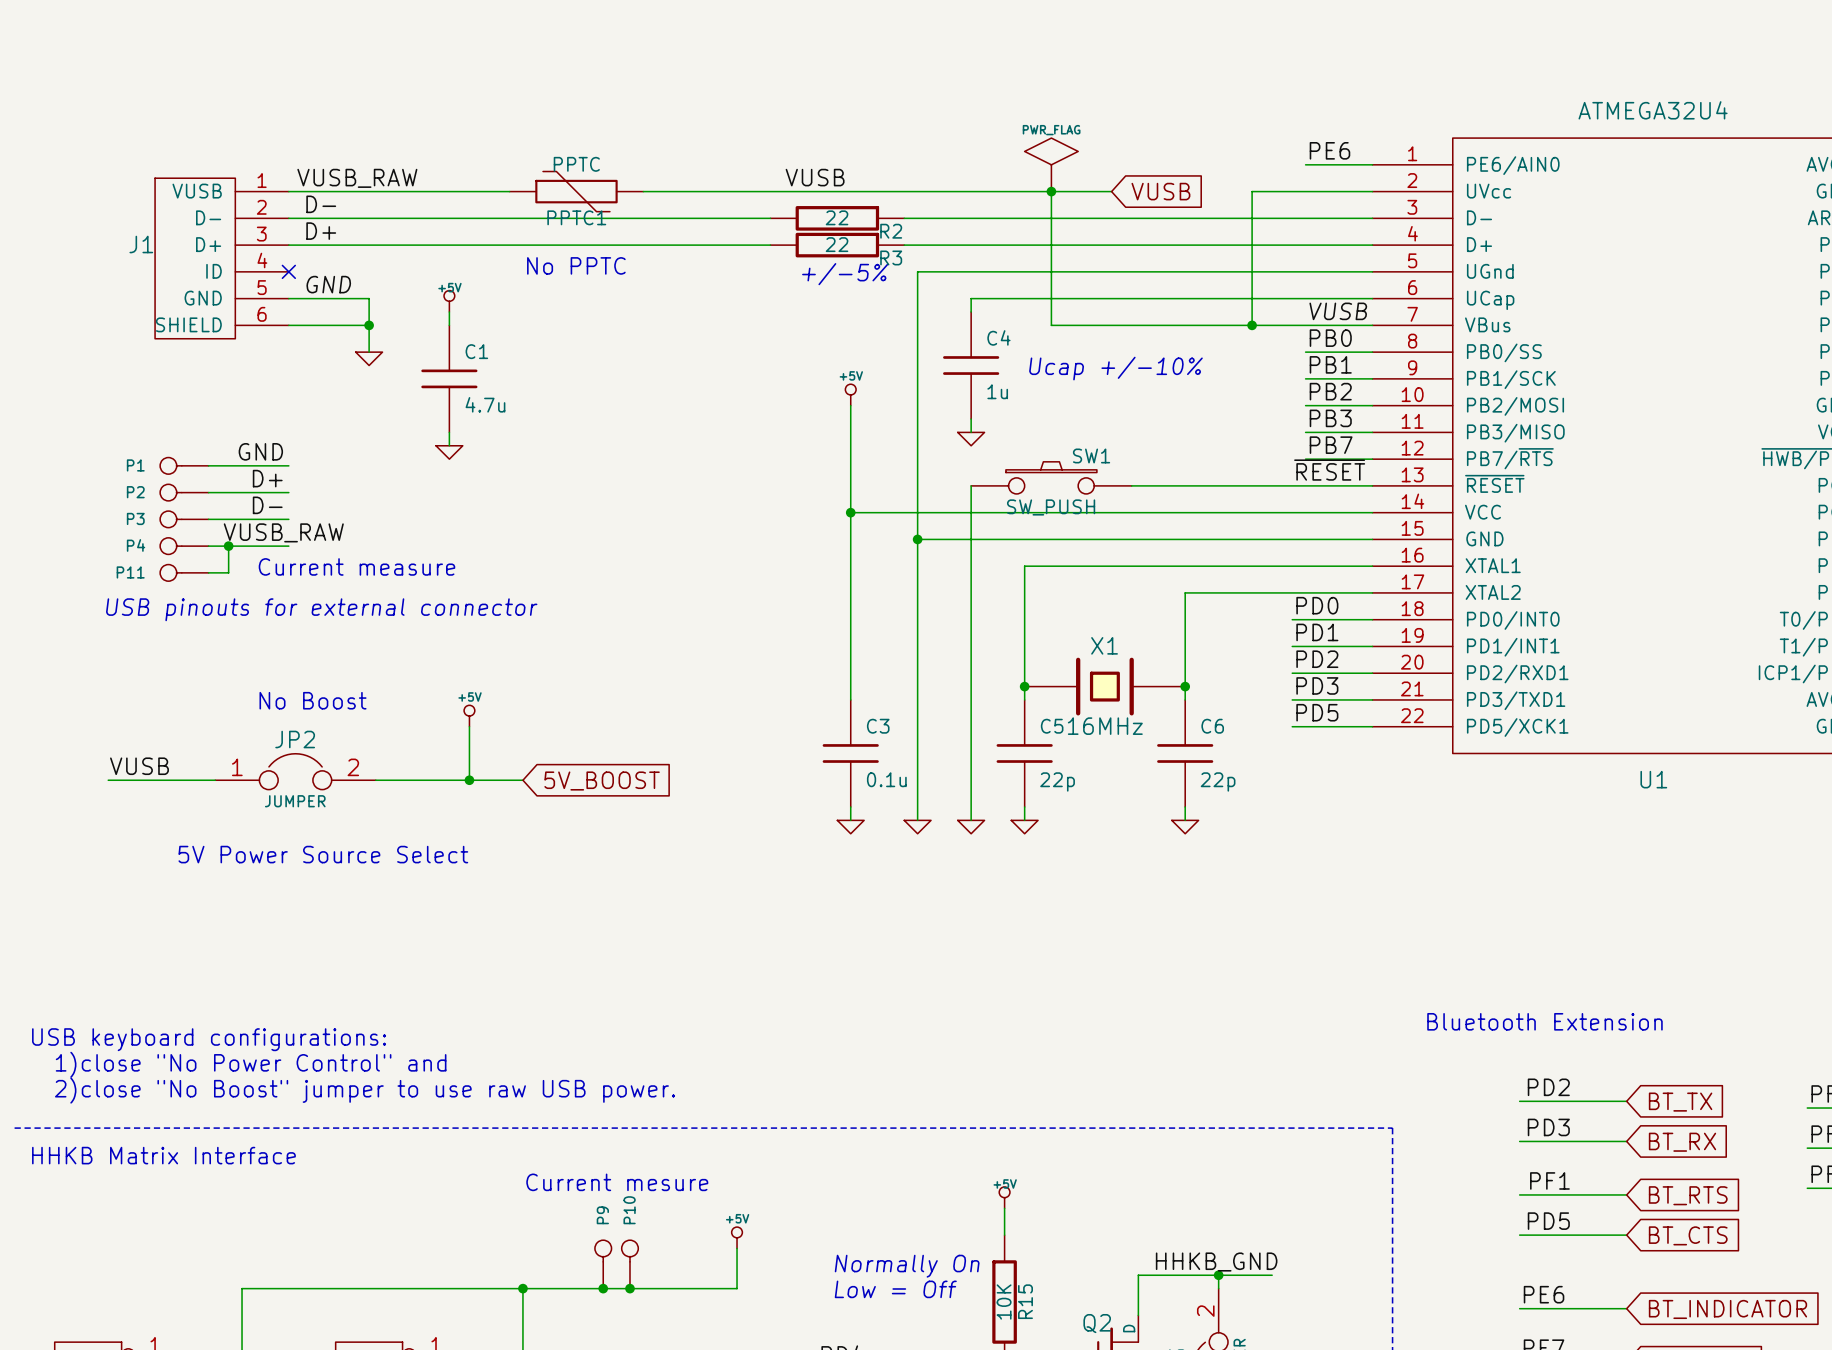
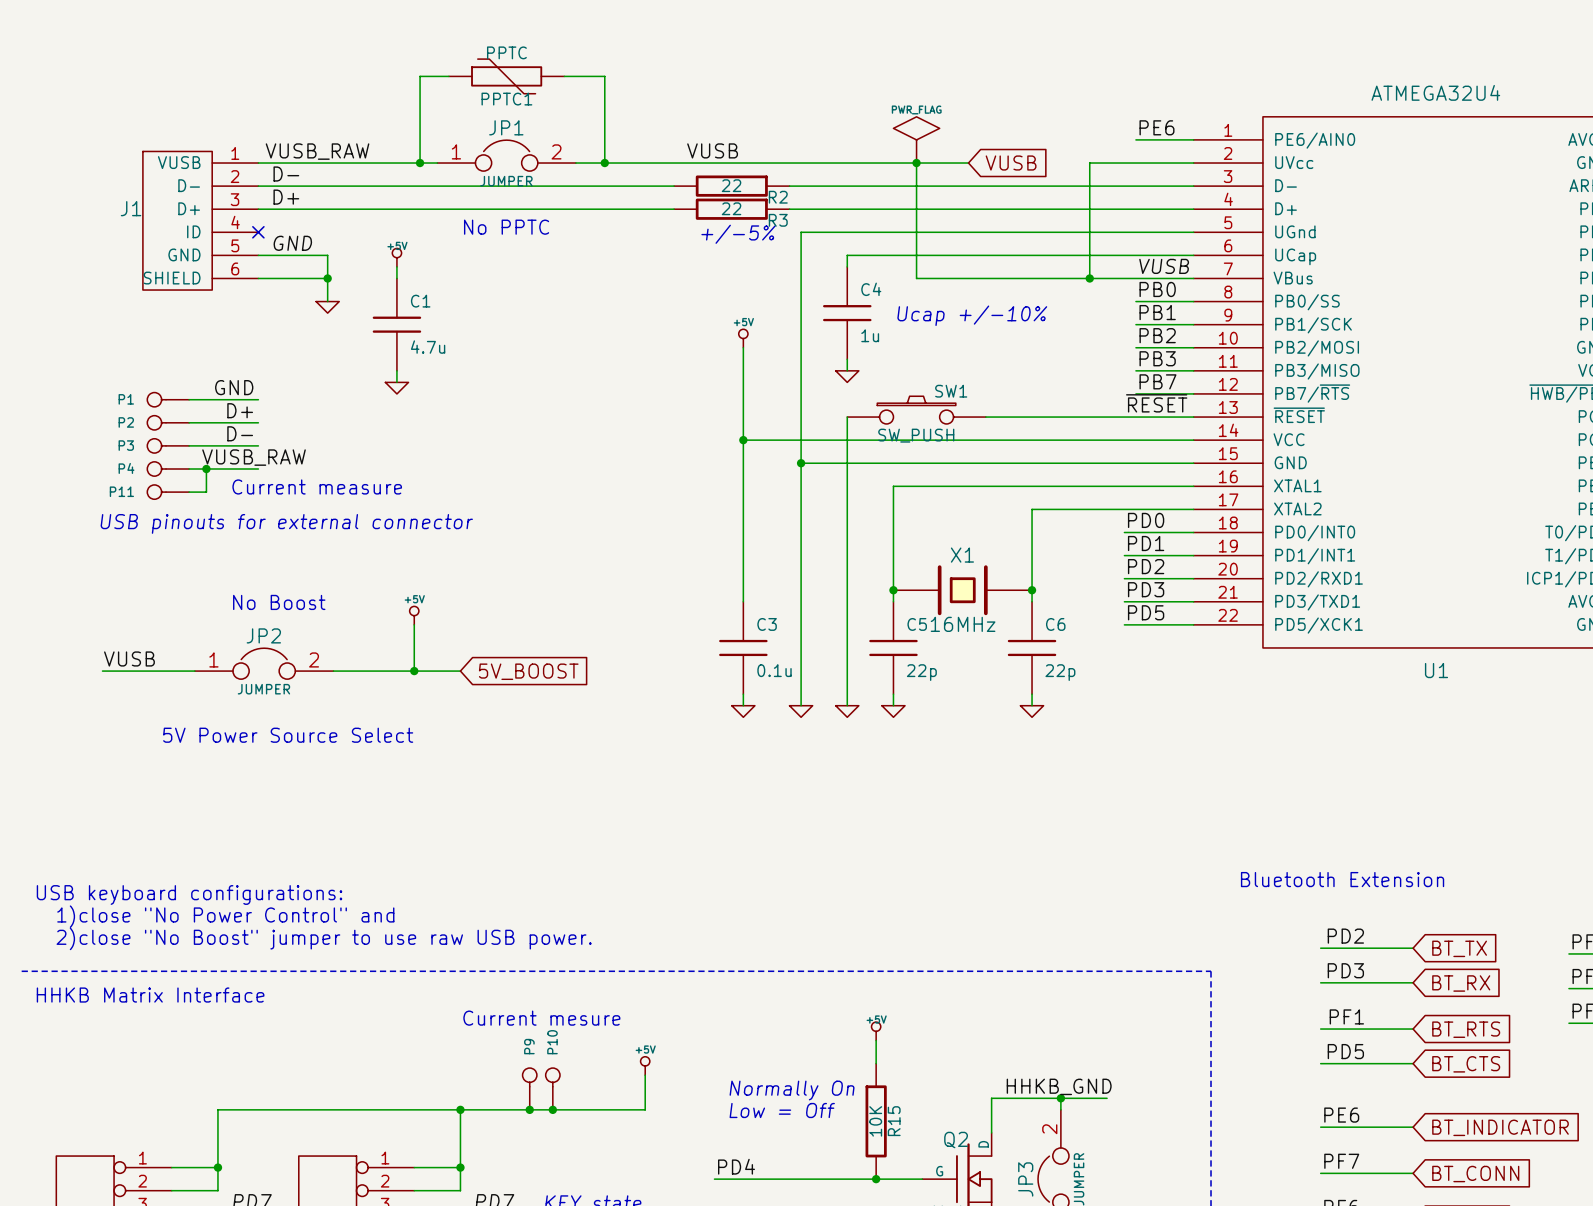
wire: none -> (448, 76) (420, 76) (420, 163)
wire: none -> (564, 76) (604, 76) (604, 163)
JP1: none -> JUMPER (506, 155)
junction: none -> (420, 163)
PPTC1 position: (576, 191) -> (506, 76)
junction: none -> (604, 163)

